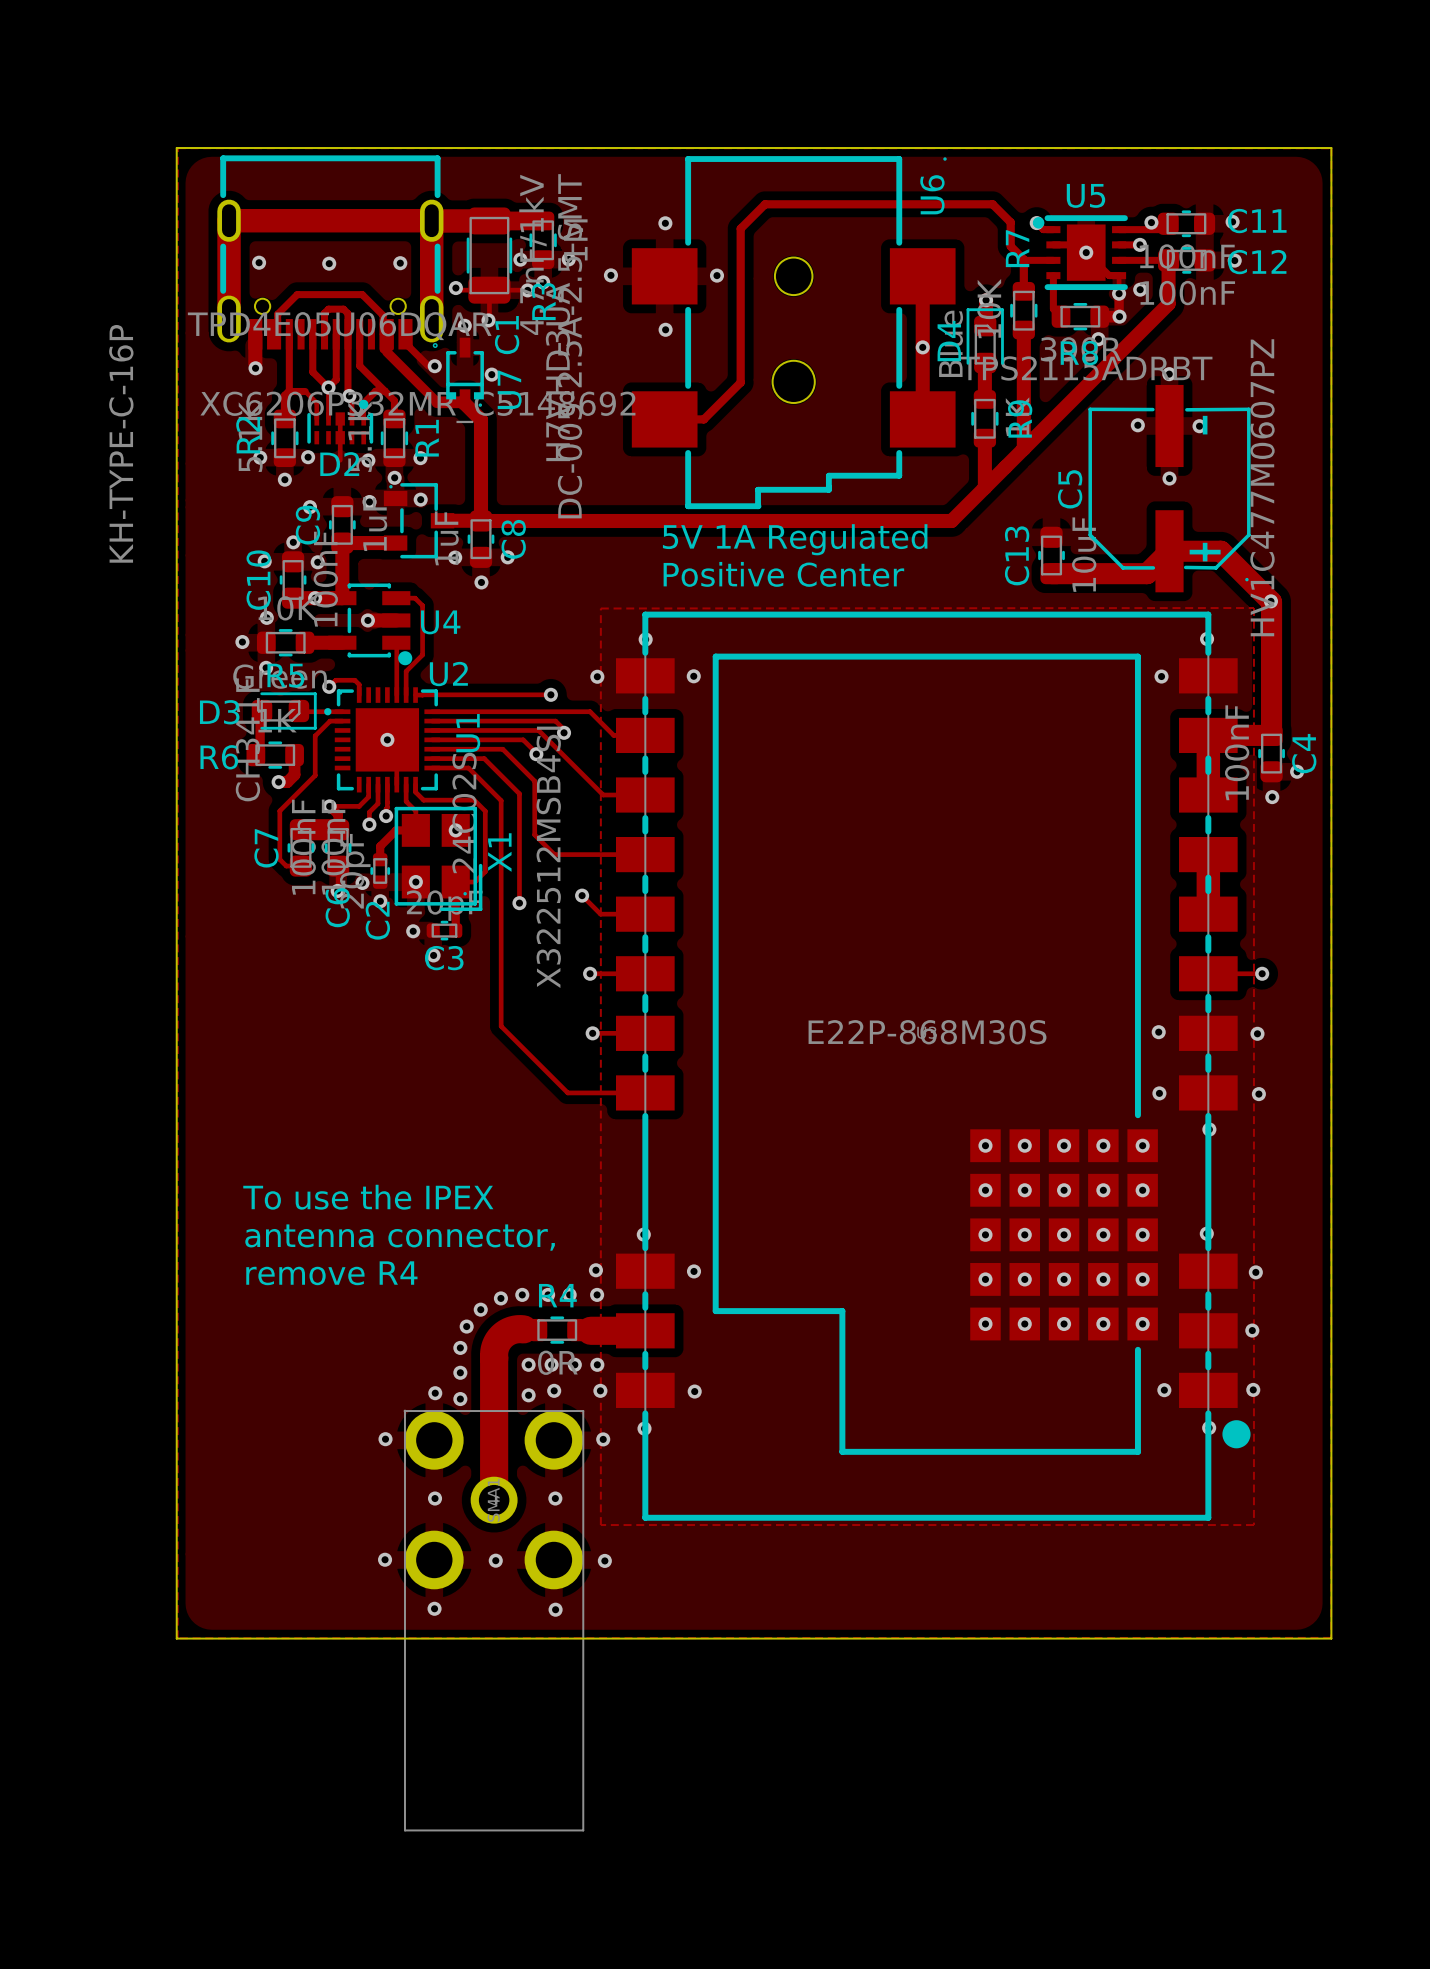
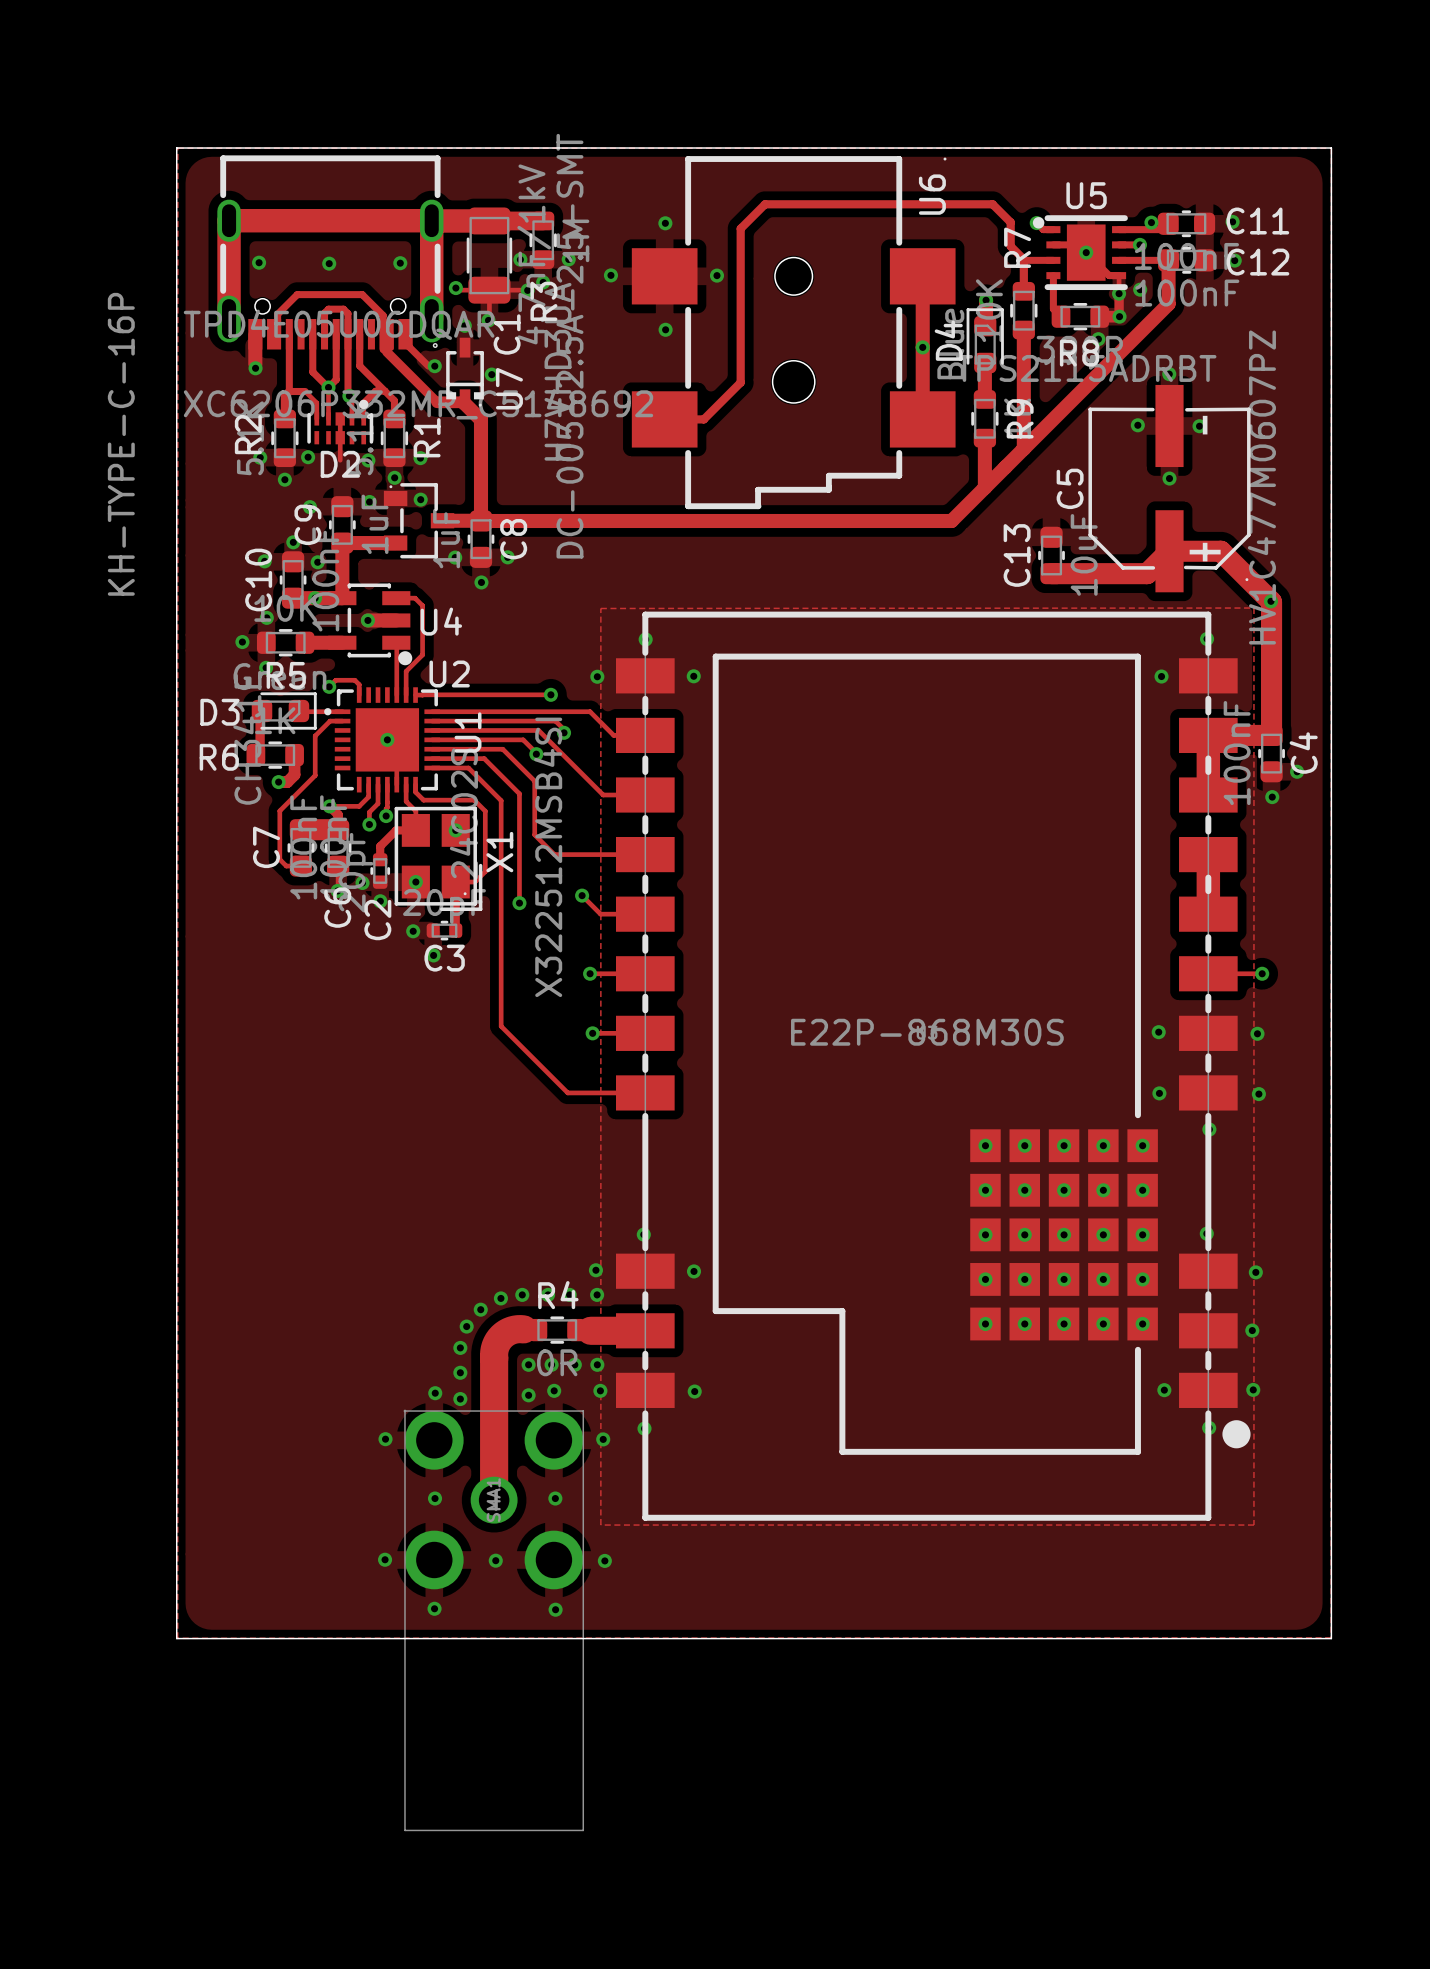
text: 5V 1A Regulated (795, 539) -> none
text: Positive Center (783, 574) -> none
text: To use the IPEX (368, 1197) -> none
text: antenna connector, (400, 1237) -> none
text: remove R4 (331, 1273) -> none

